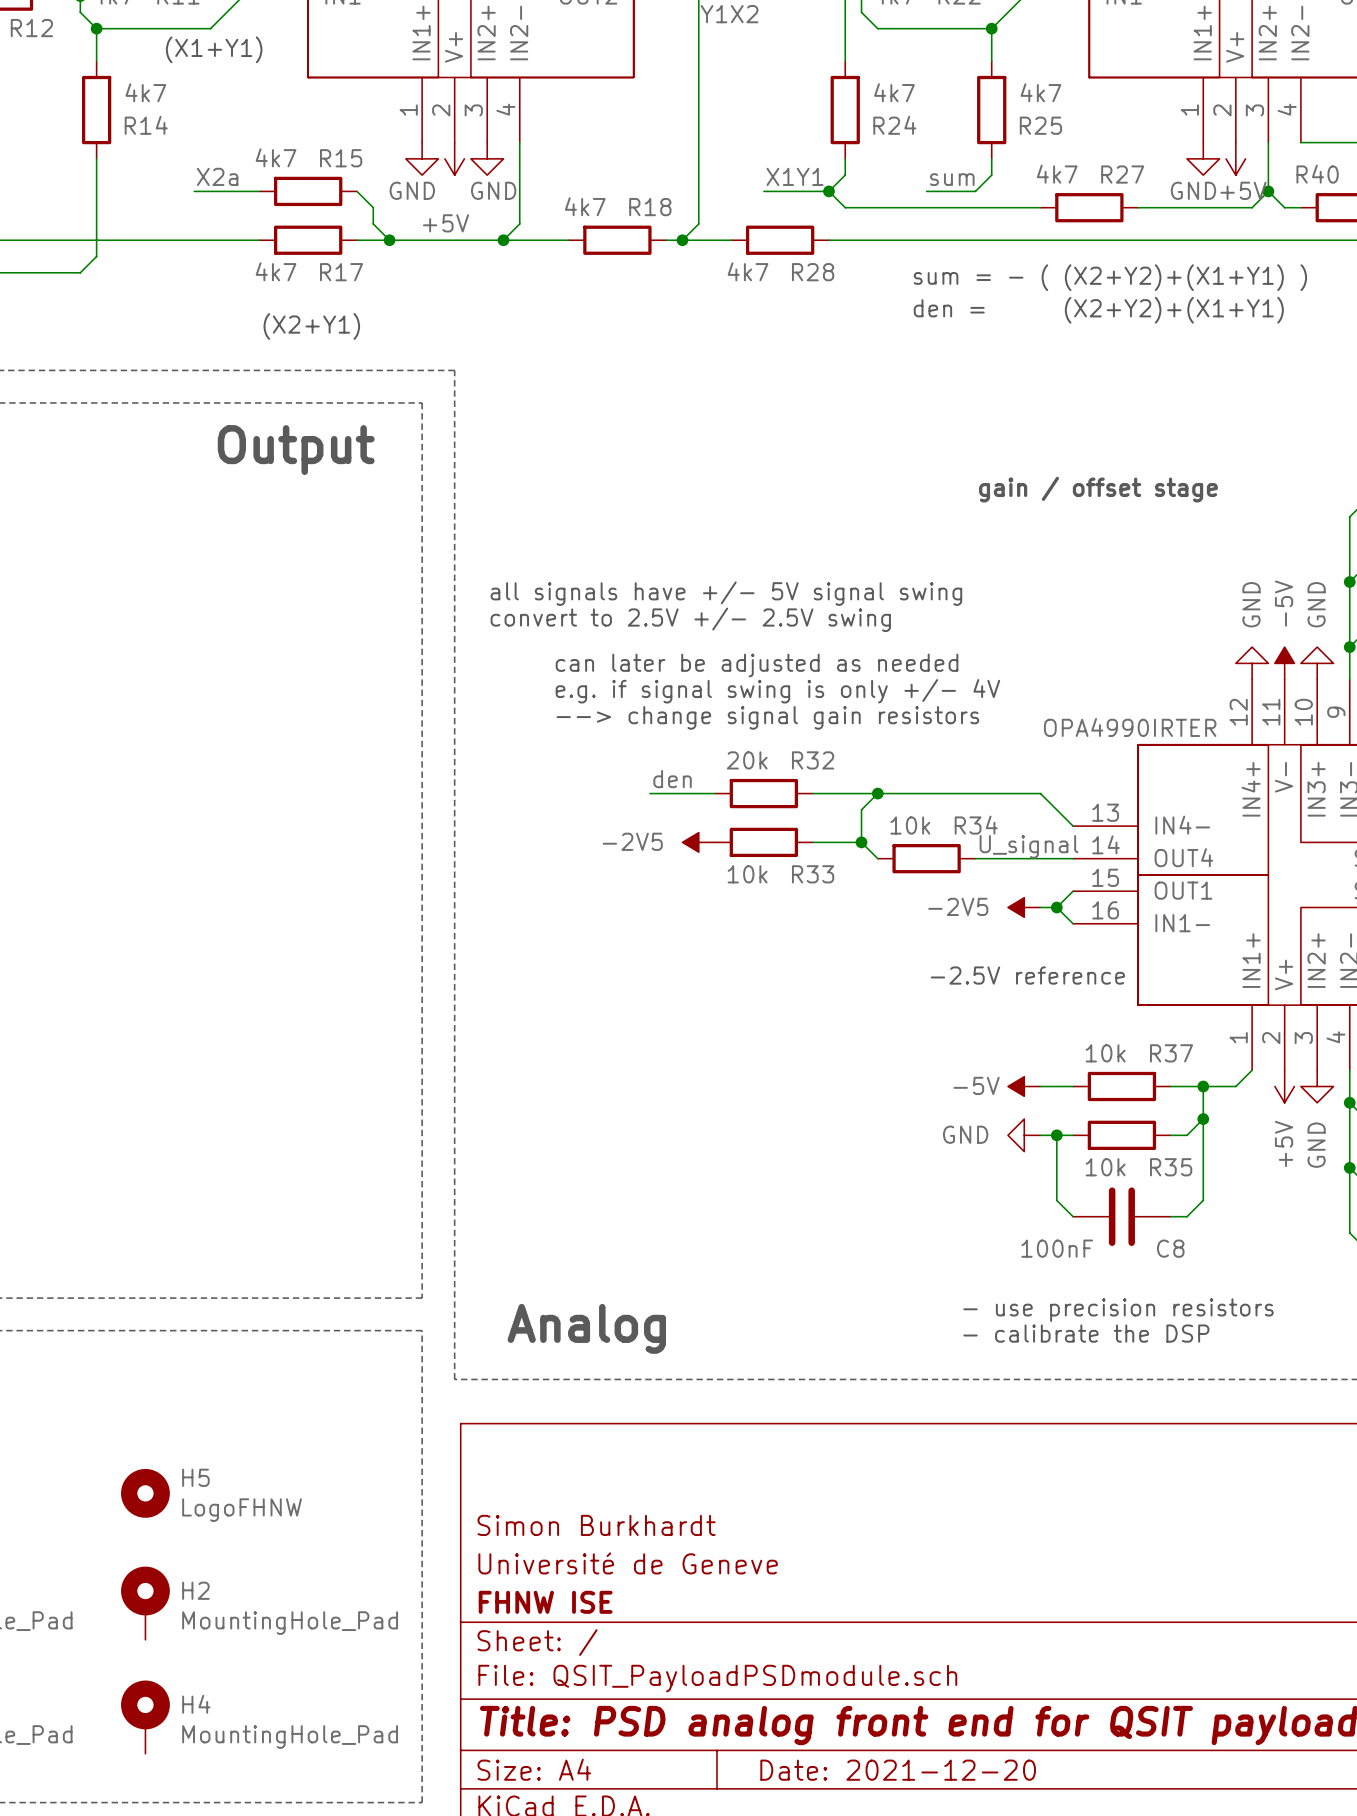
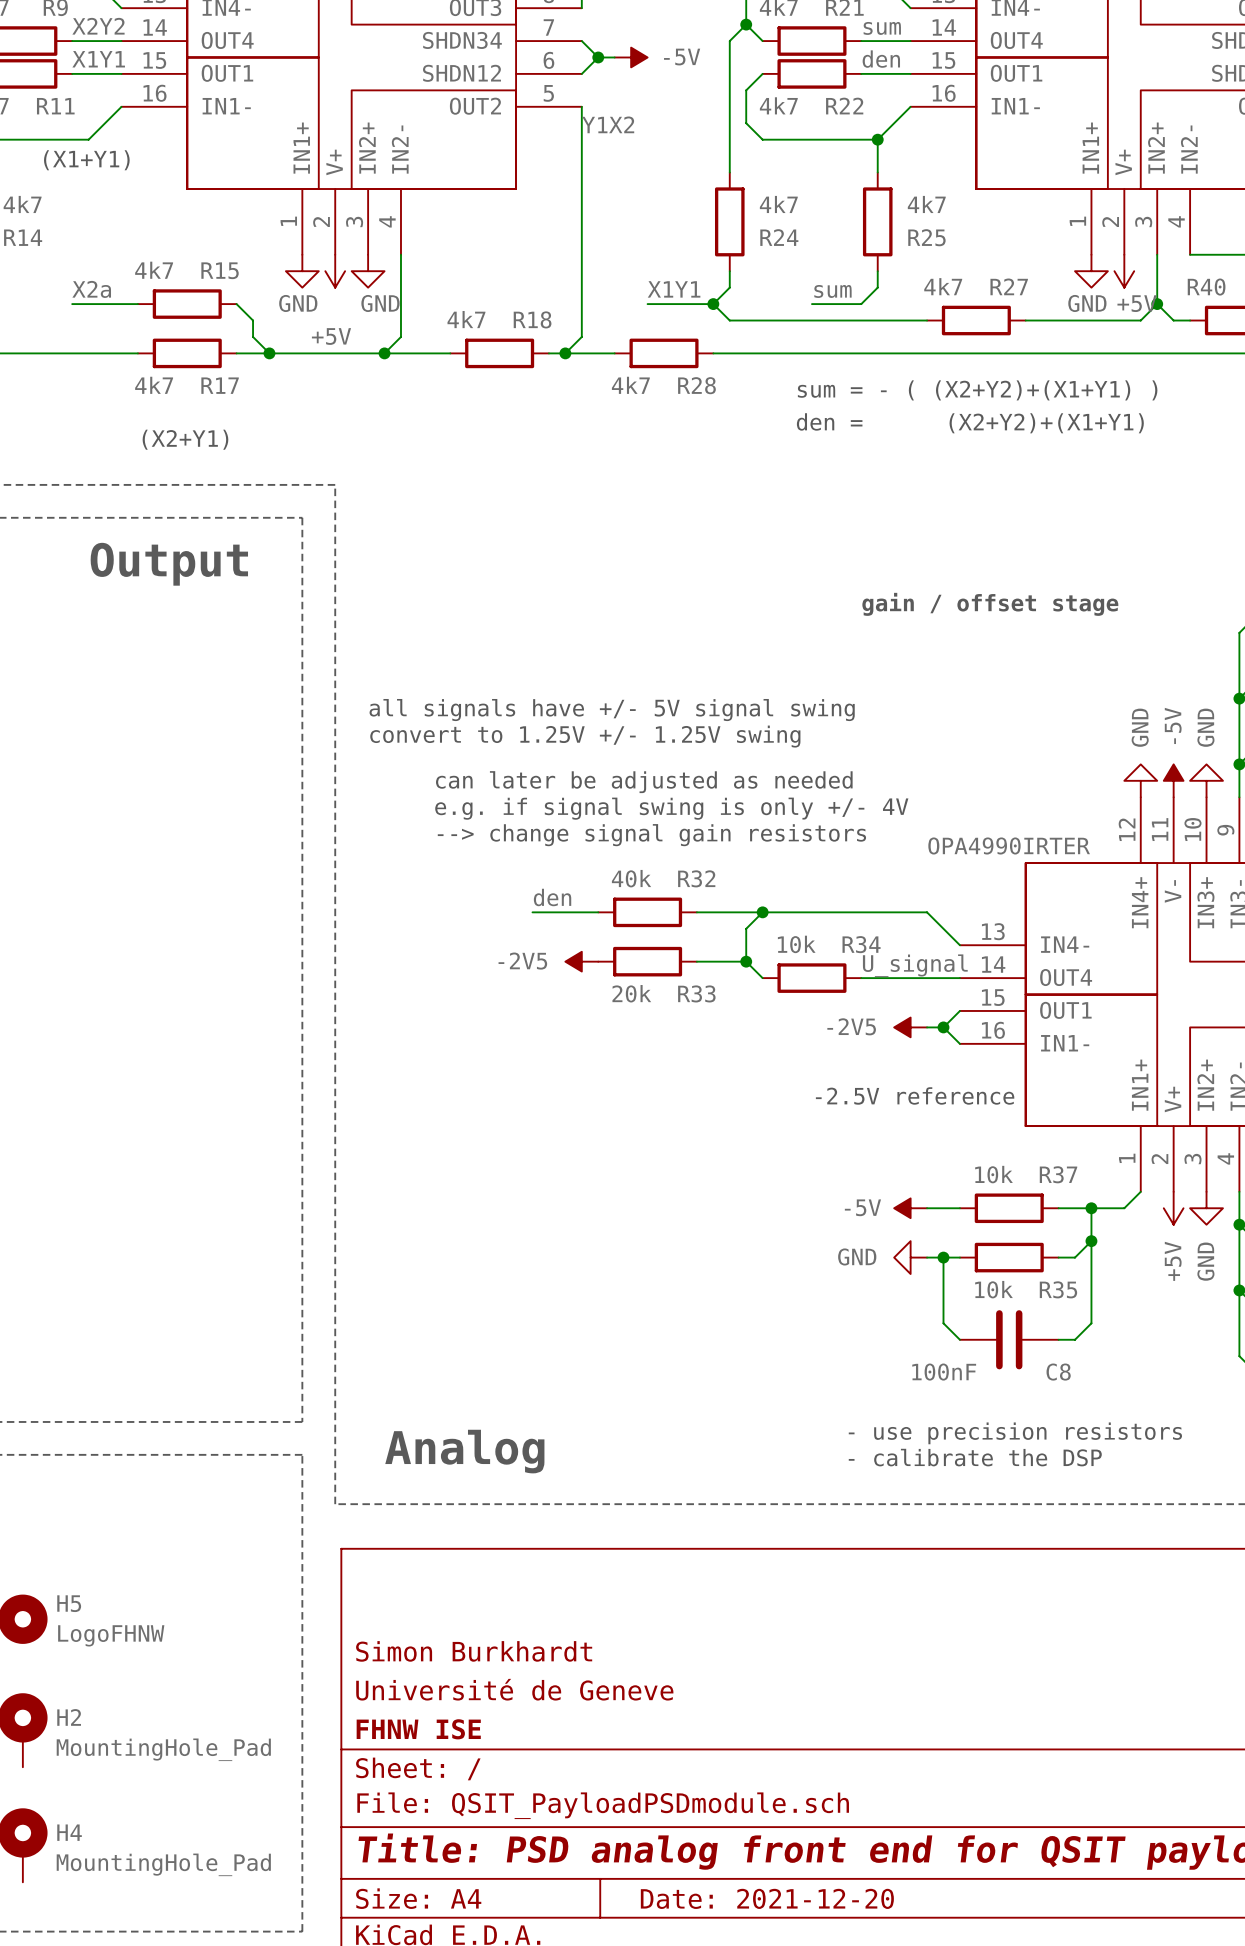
text: convert to 2.5V +/- 2.5V swing (690, 619) -> convert to 1.25V +/- 1.25V swing (585, 736)
R32 value: 20k (747, 760) -> 40k (631, 878)
R33 value: 10k (747, 874) -> 20k (631, 993)

